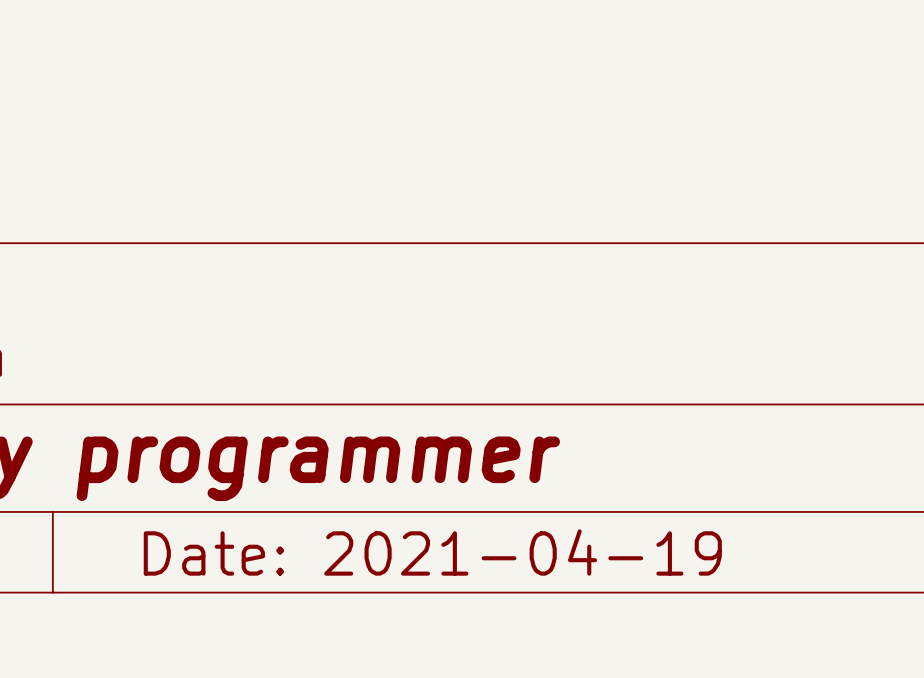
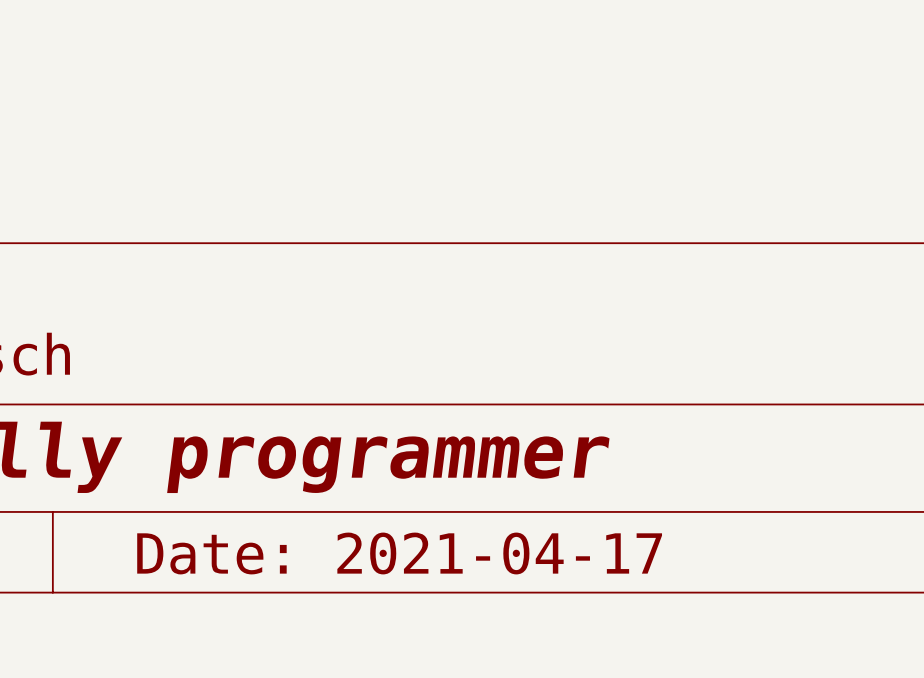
title block: Date: 2021-04-19 (432, 552) -> Date: 2021-04-17 (399, 553)

